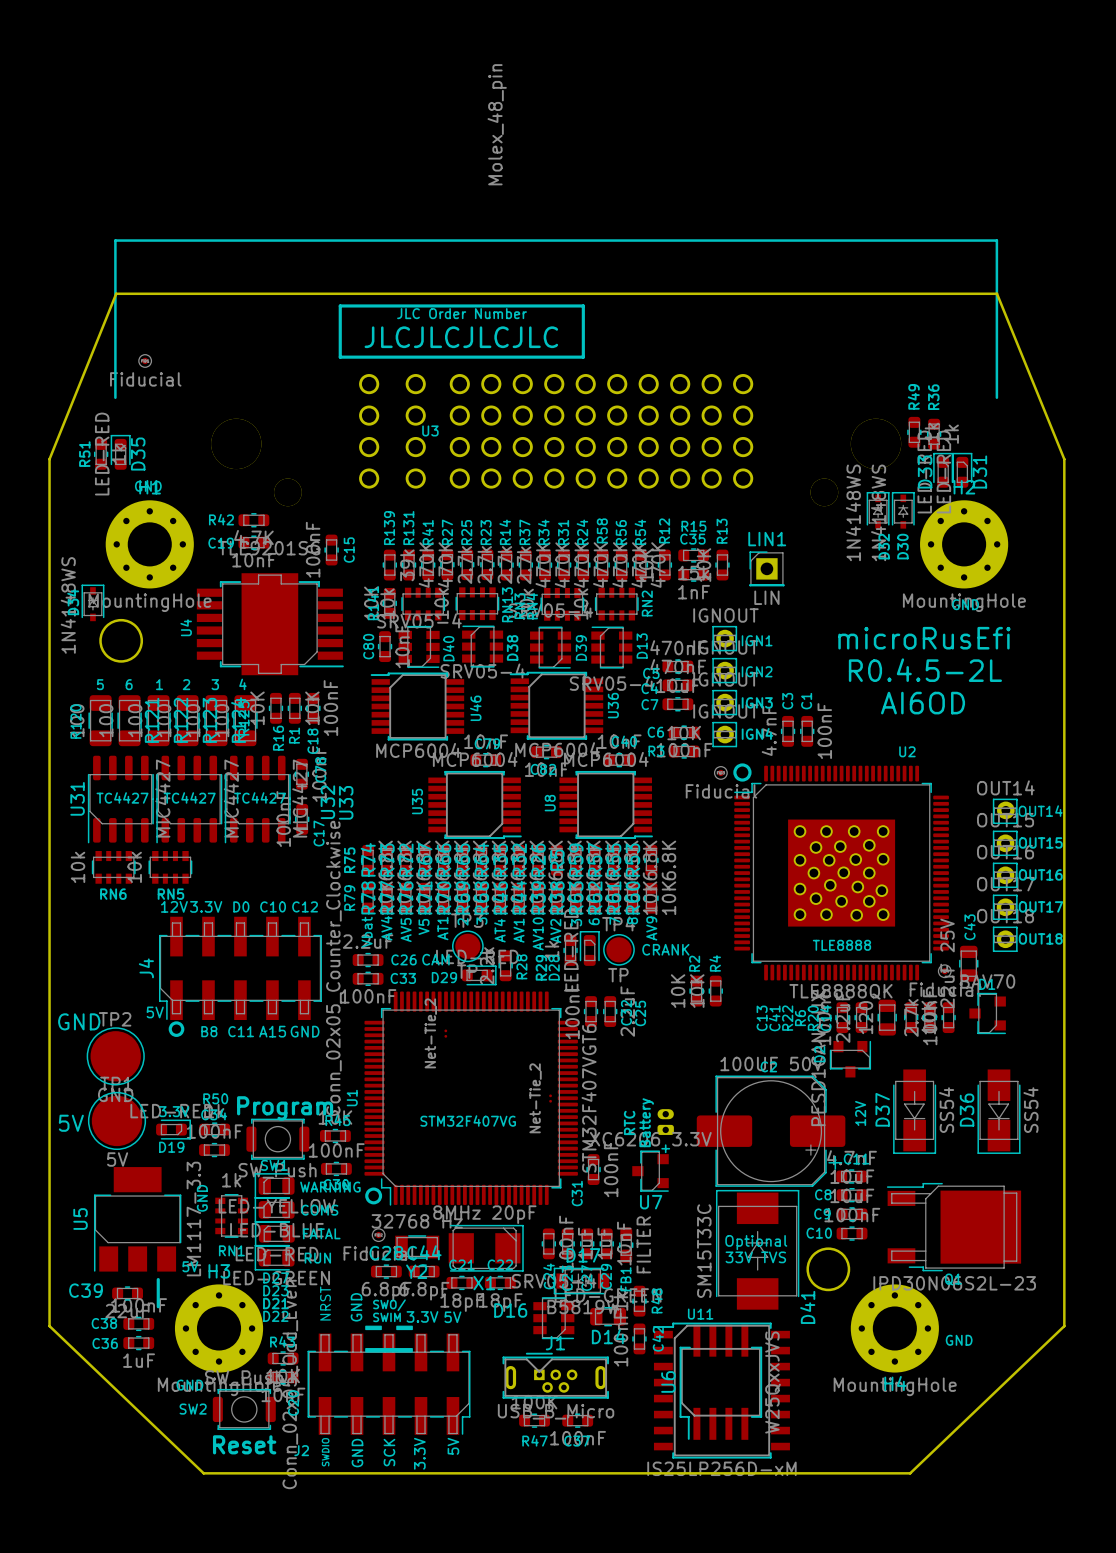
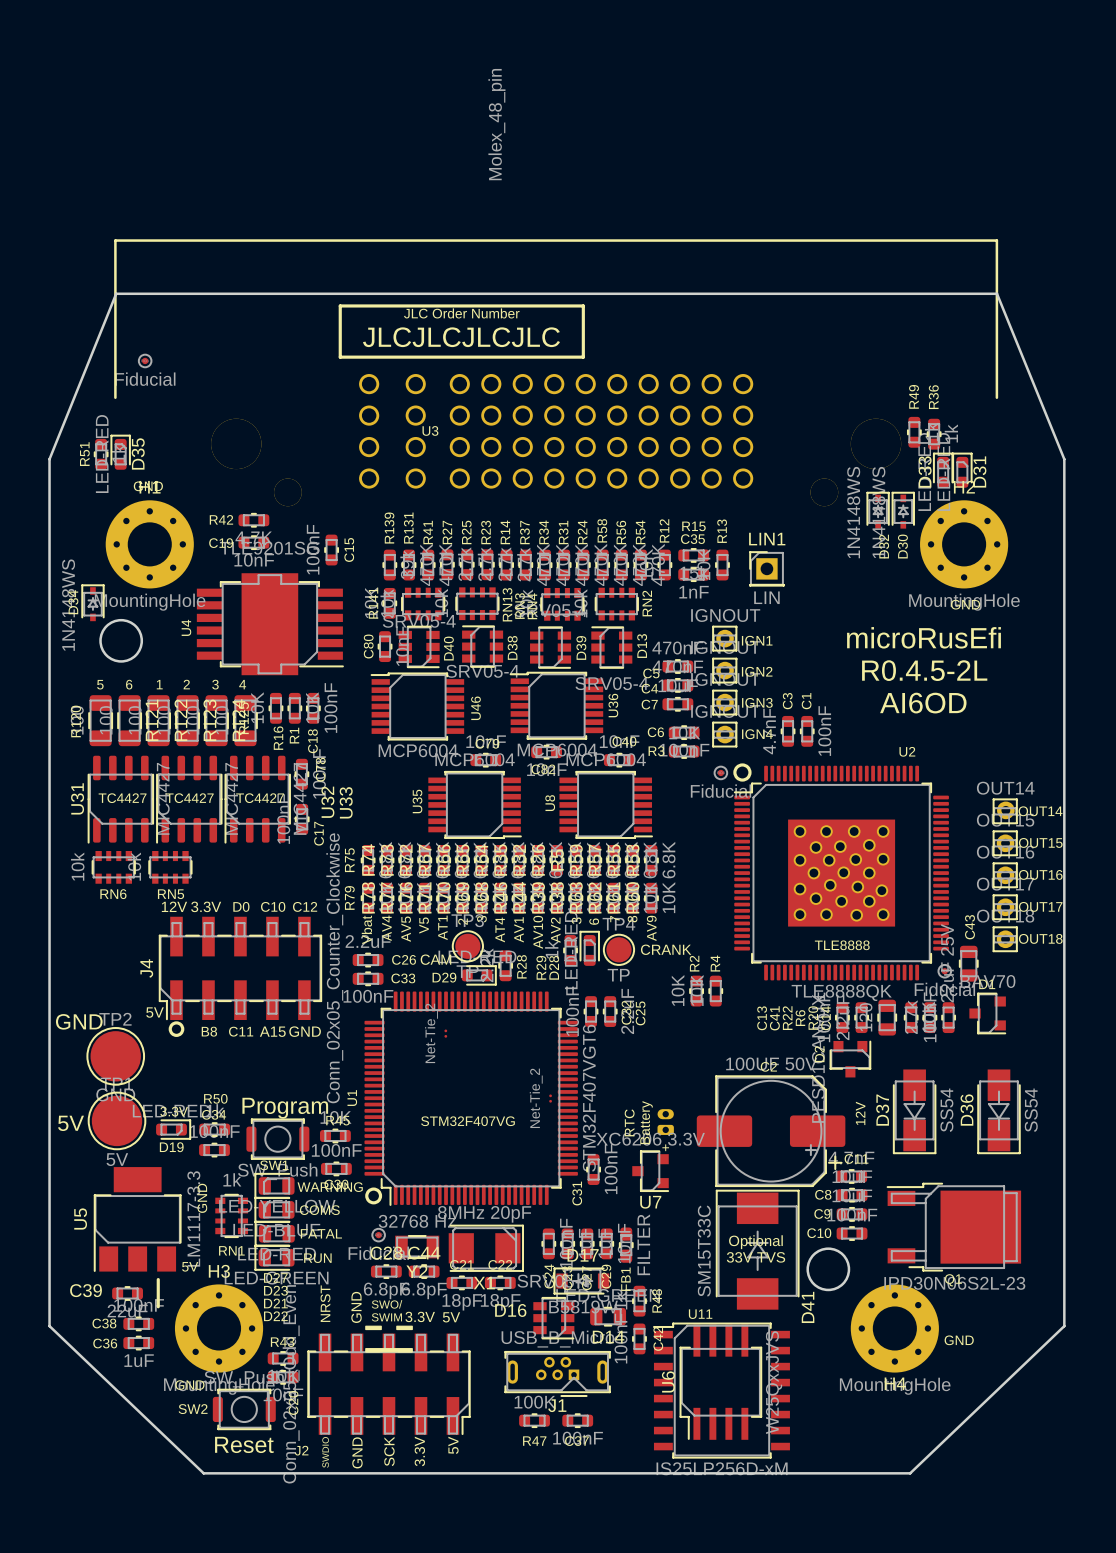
J1 rotation: 0° (555, 1375) -> 180° (557, 1373)

